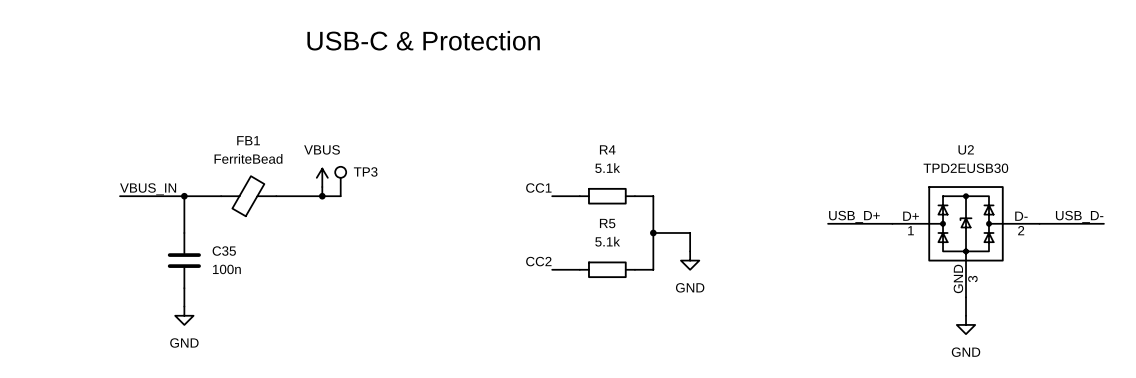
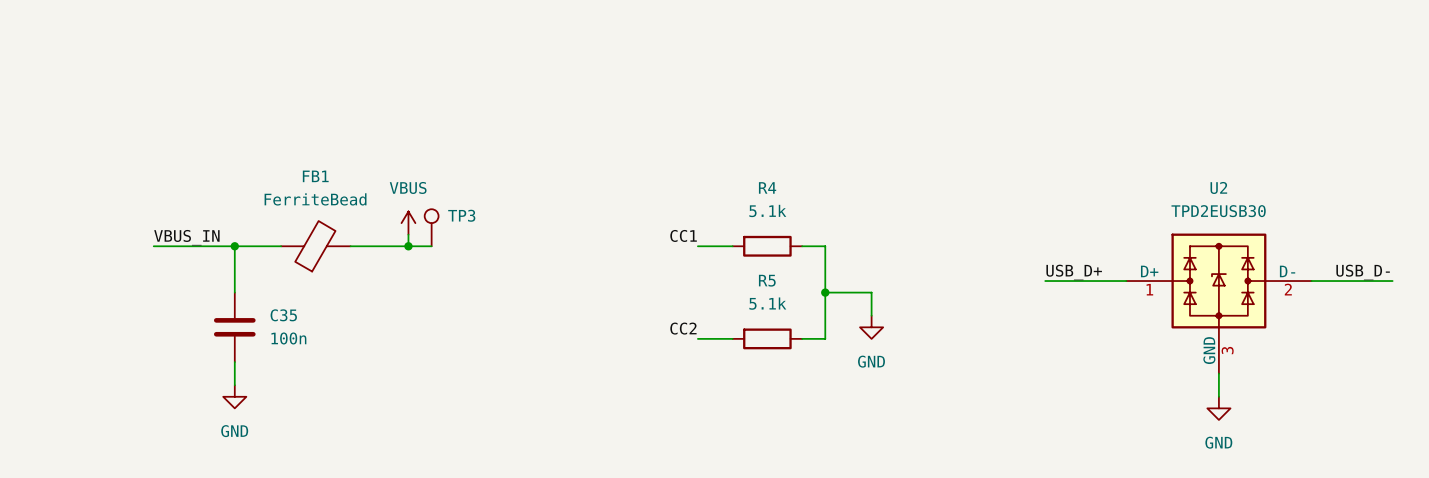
text: USB-C & Protection (423, 40) -> none

